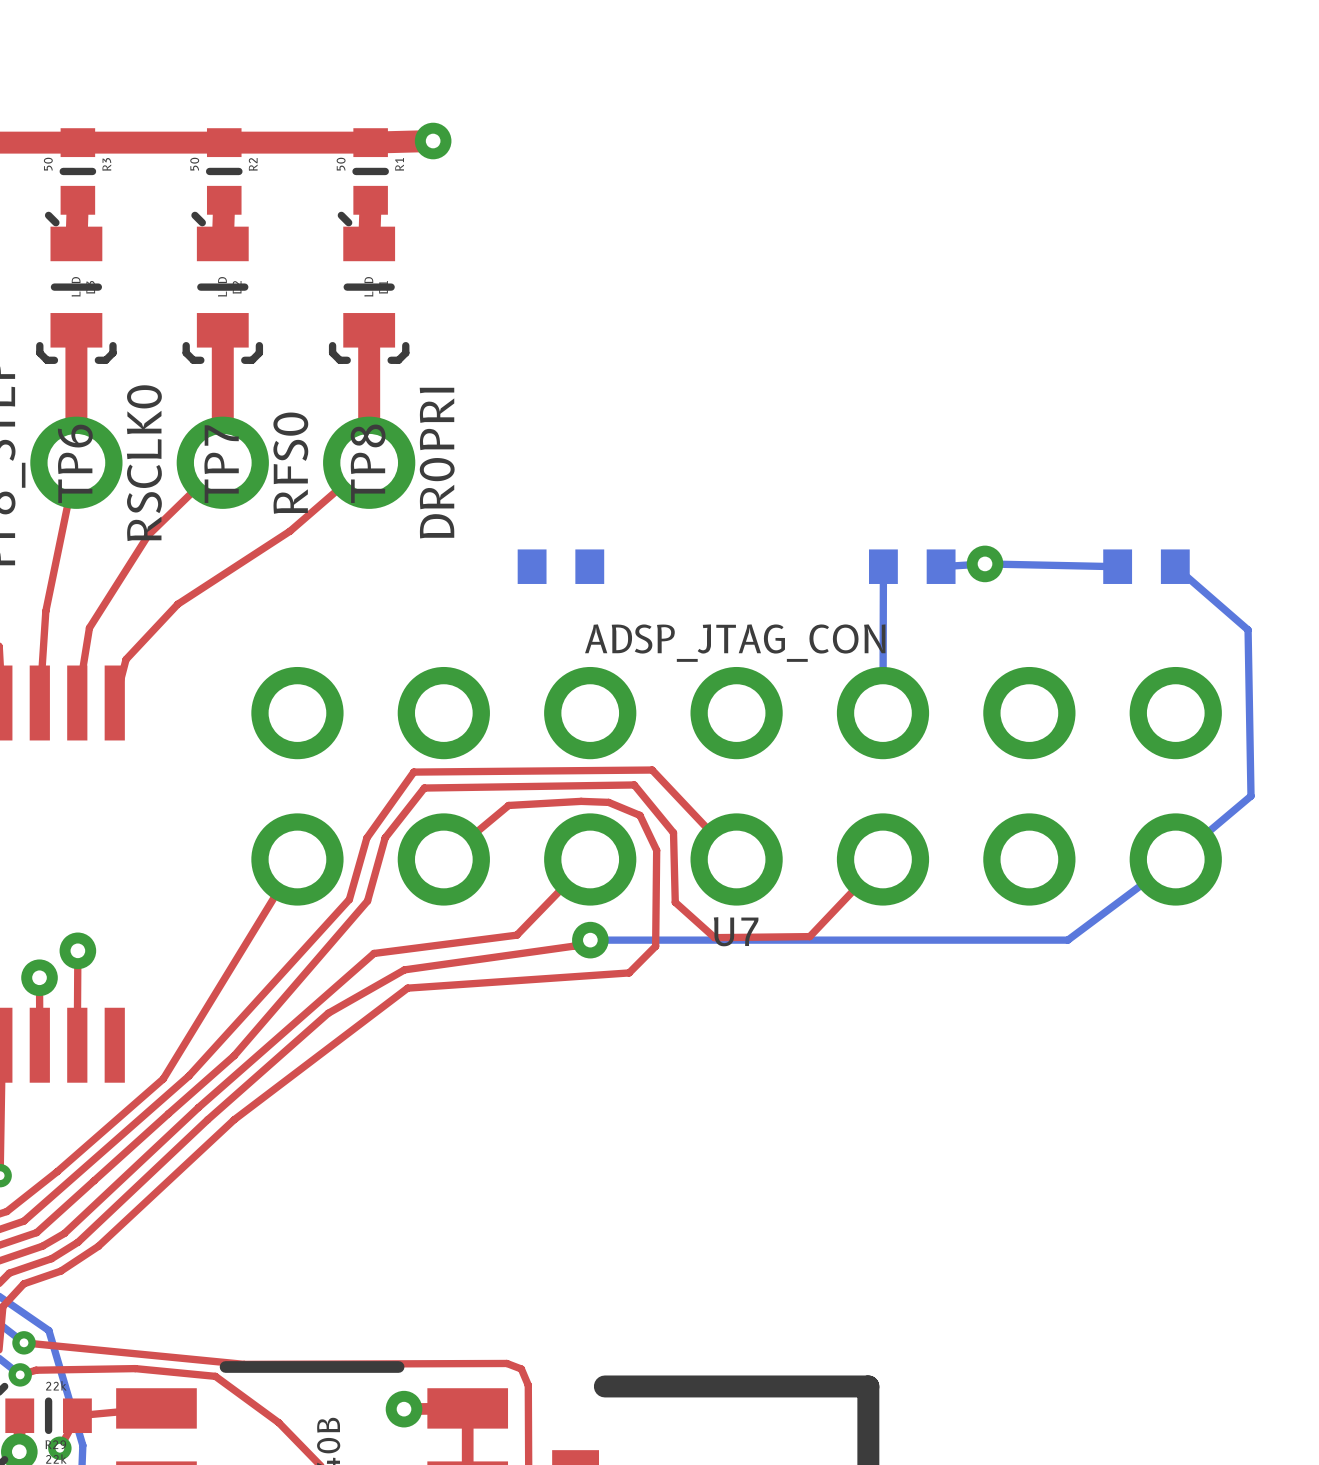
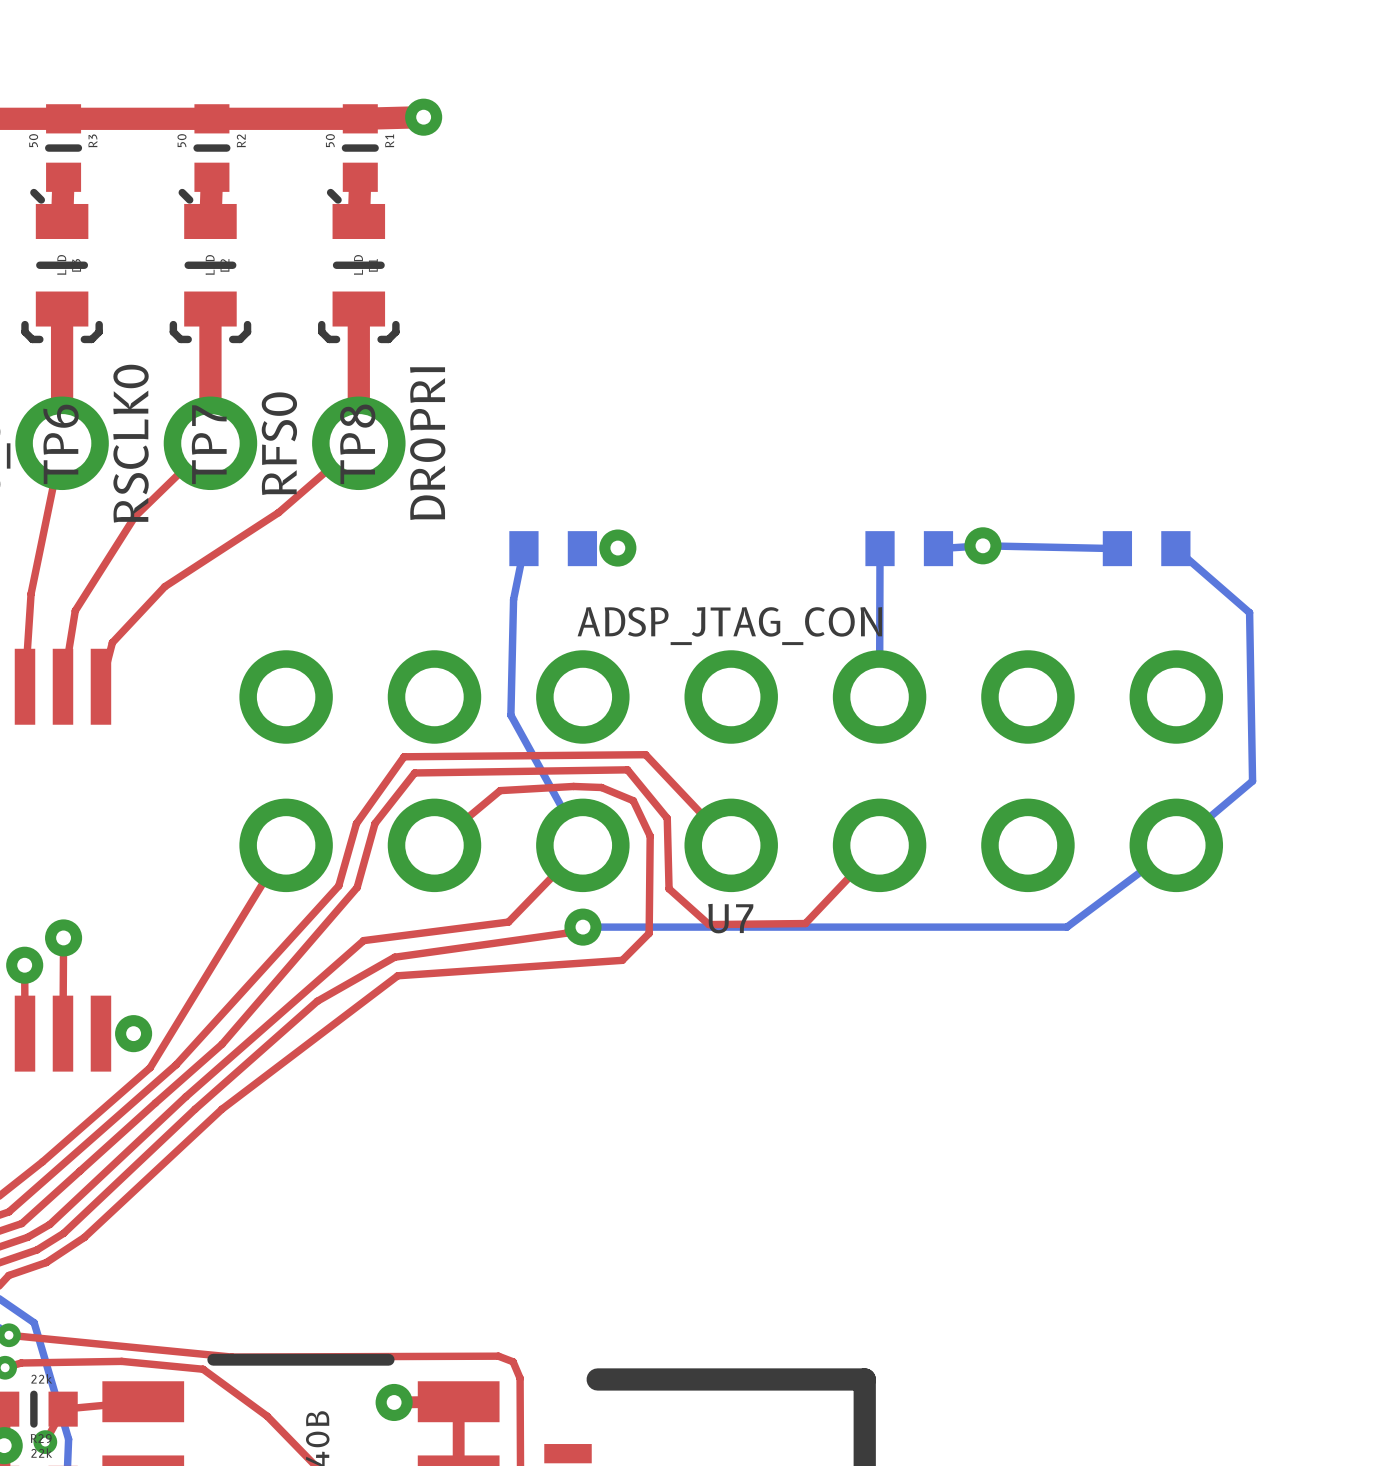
bottom track: none -> (523, 548) (513, 599) (510, 715) (582, 845)
via: none -> (617, 548)
via: none -> (133, 1033)

